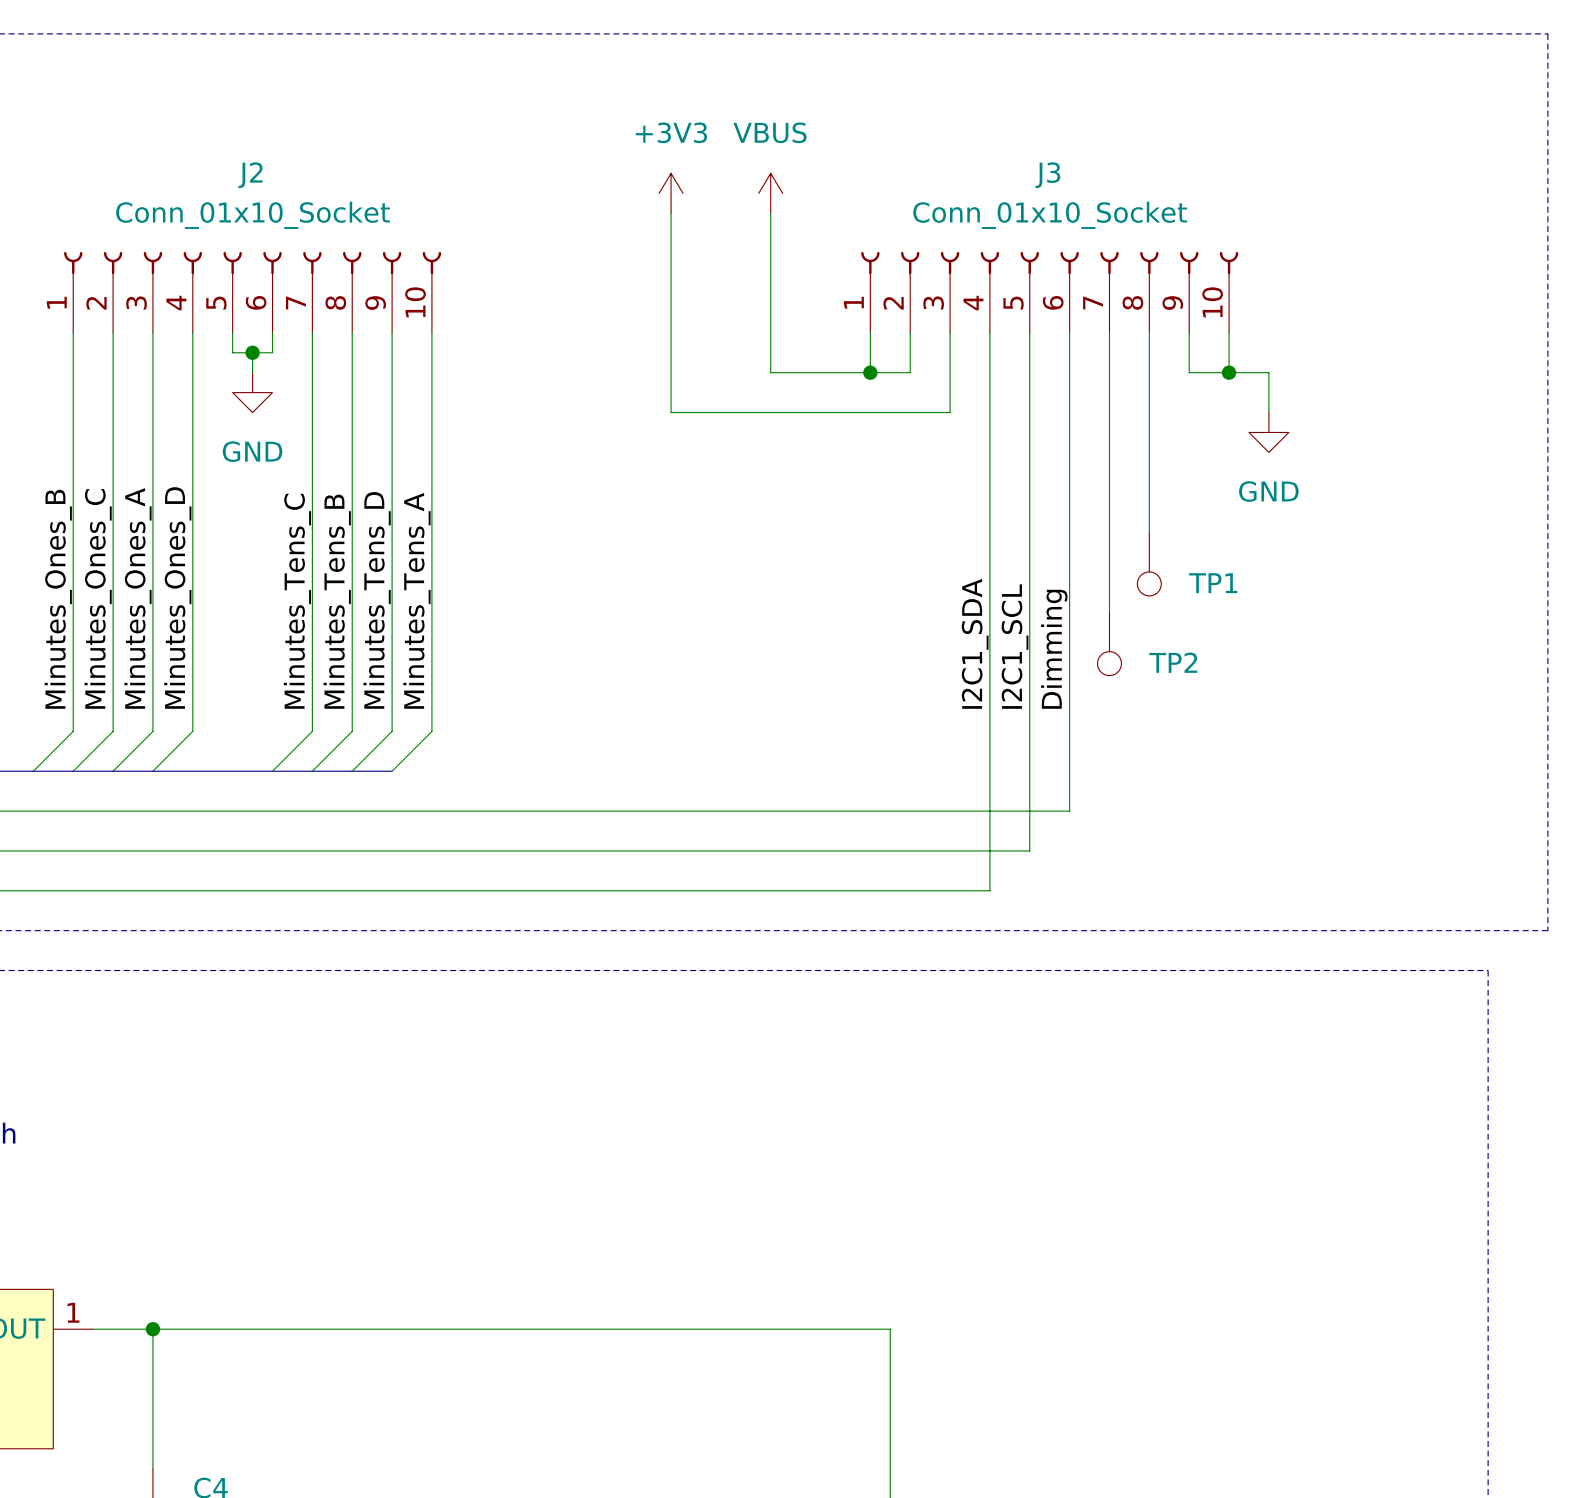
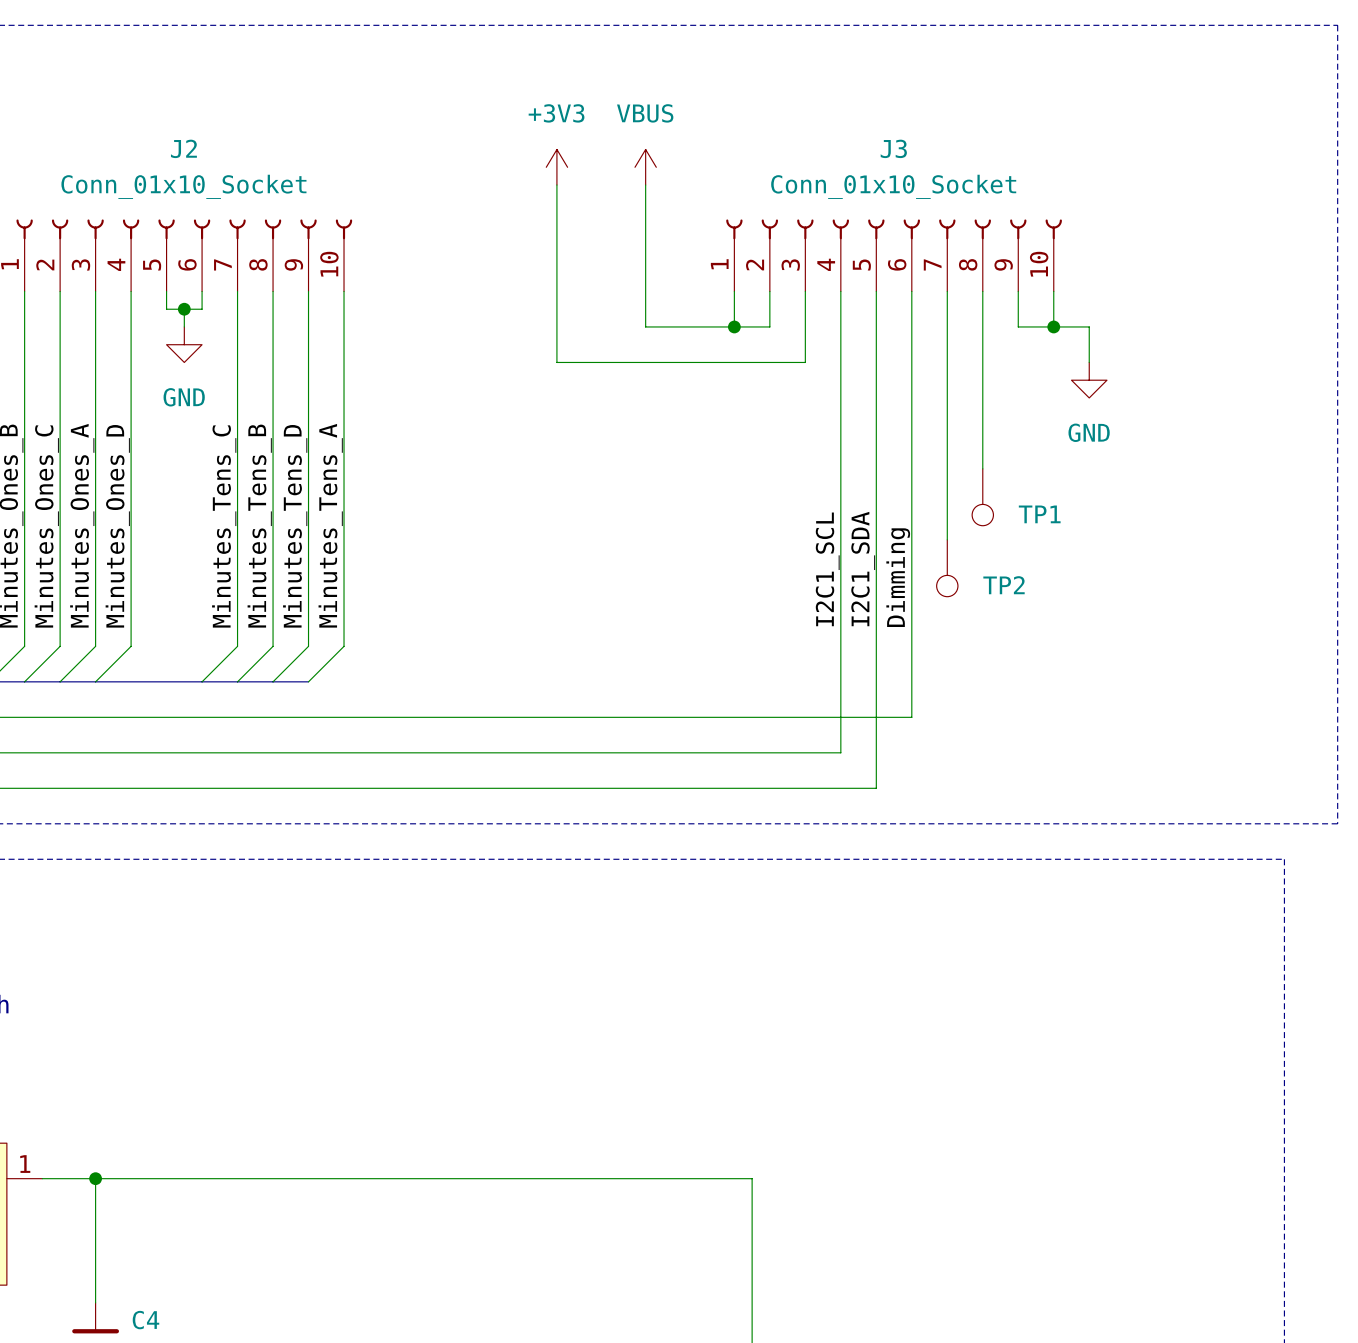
label: I2C1_SDA (975, 643) -> I2C1_SCL (827, 569)
label: I2C1_SCL (1015, 646) -> I2C1_SDA (863, 569)
wire: (1029, 850) (989, 850) (989, 890) -> (876, 752) (876, 788) (840, 788)

